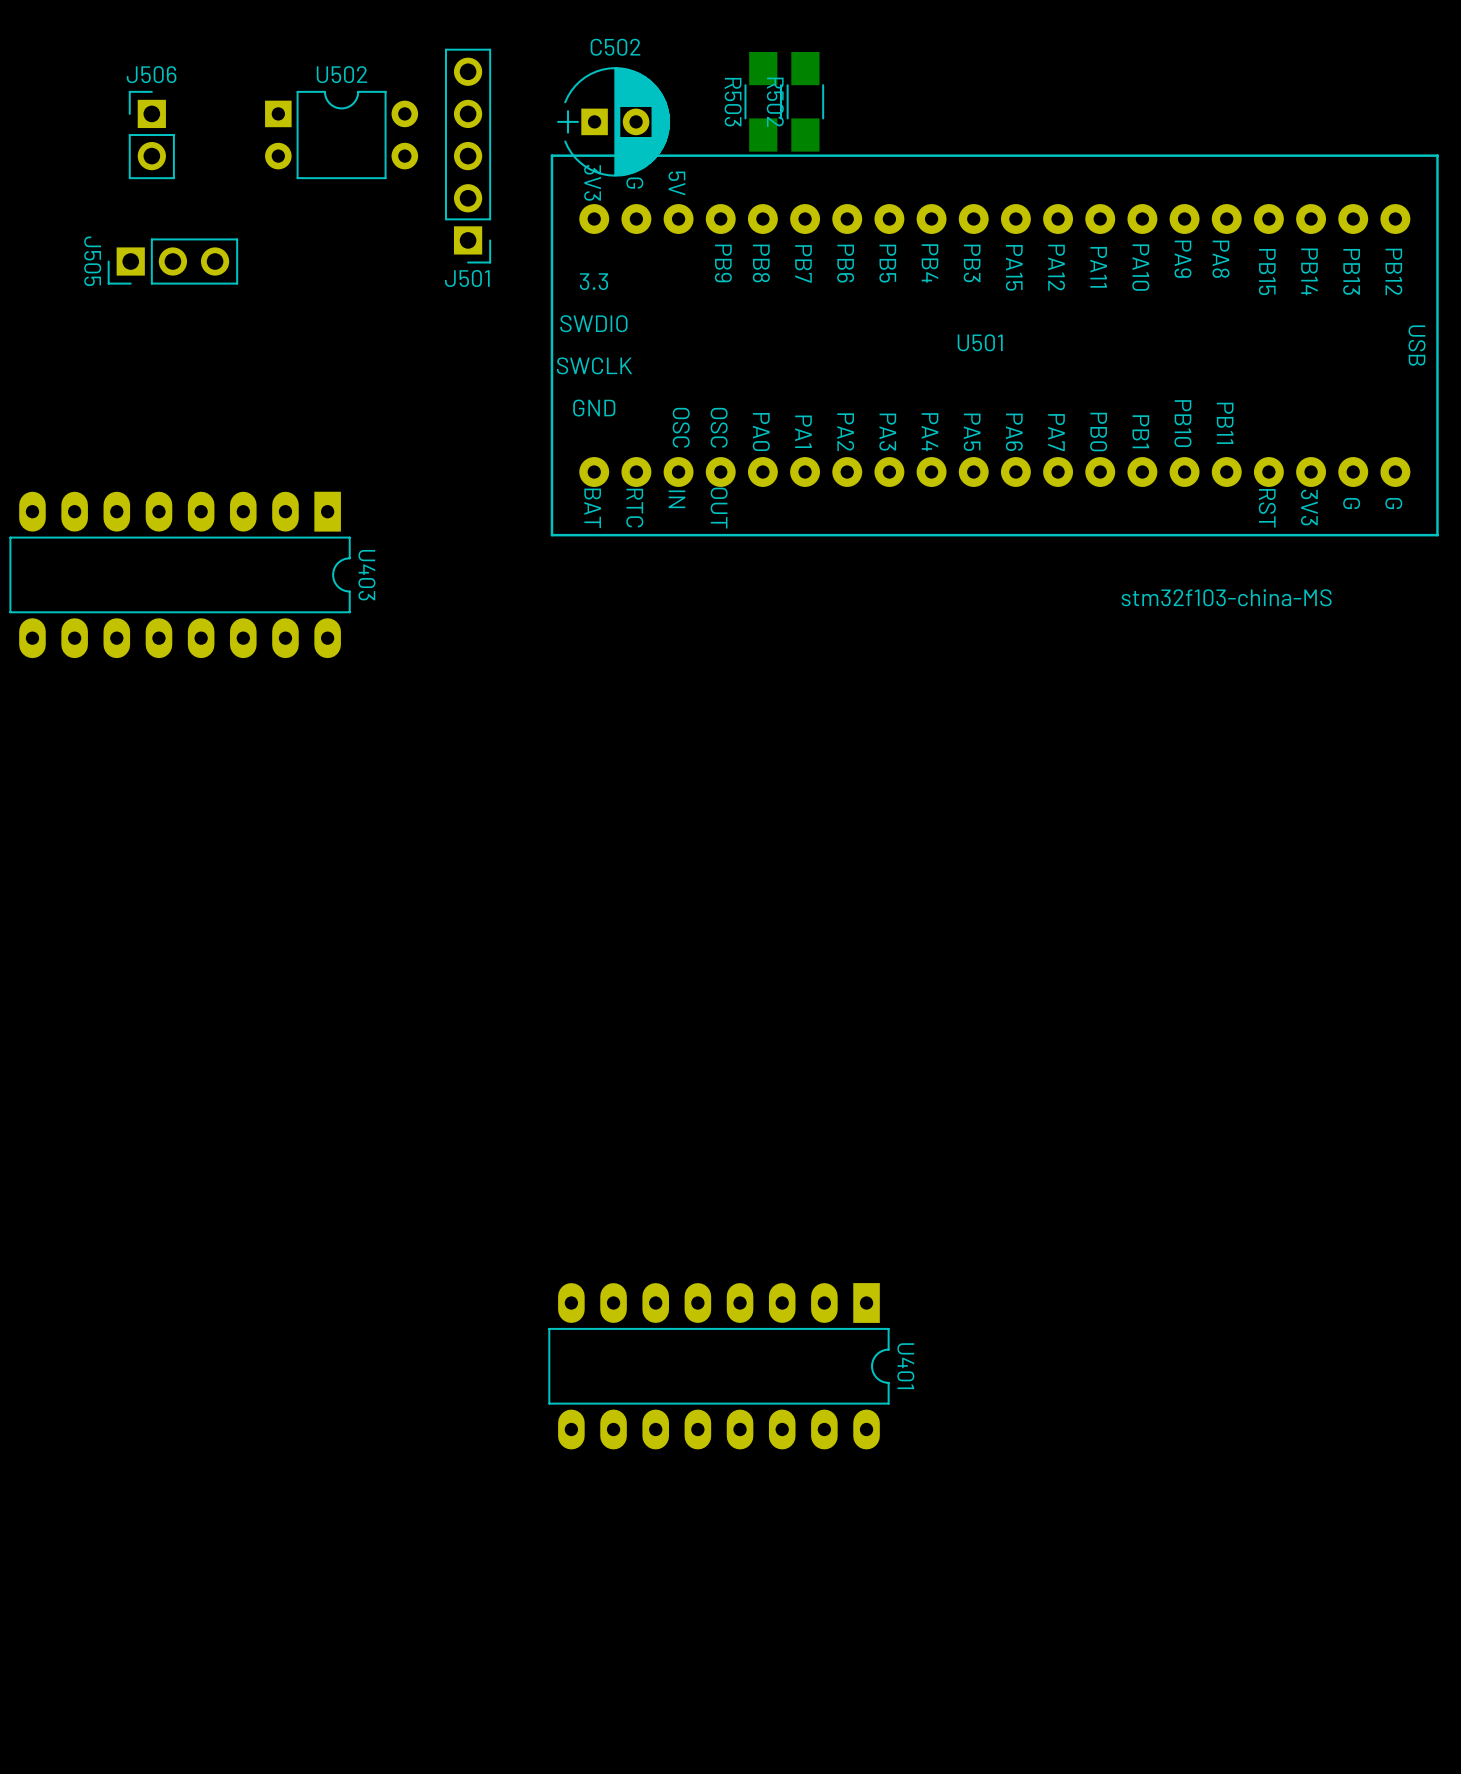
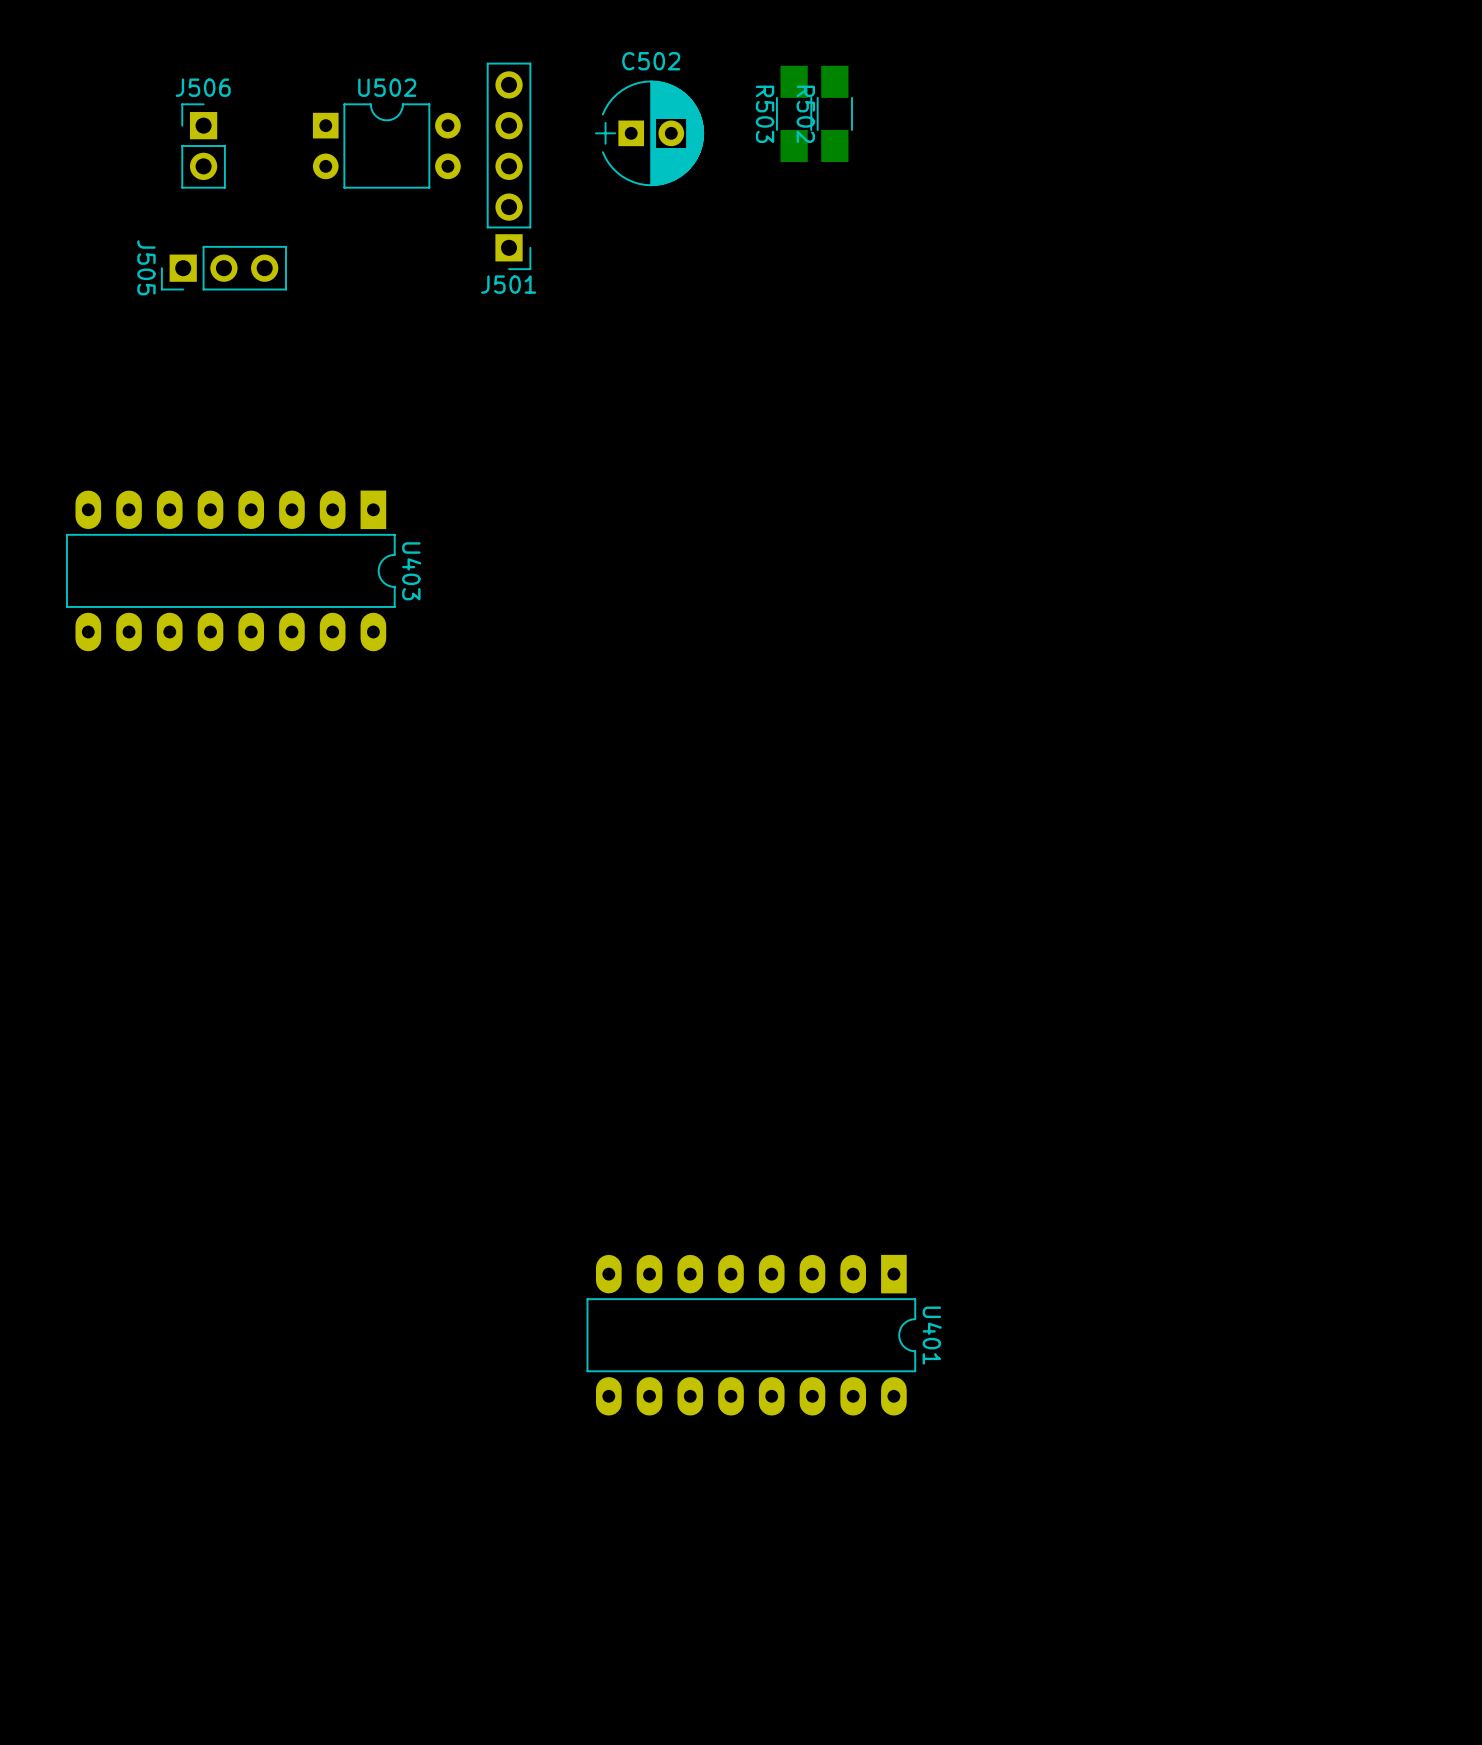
U501: stm32f103-china-MS (994, 345) -> none

